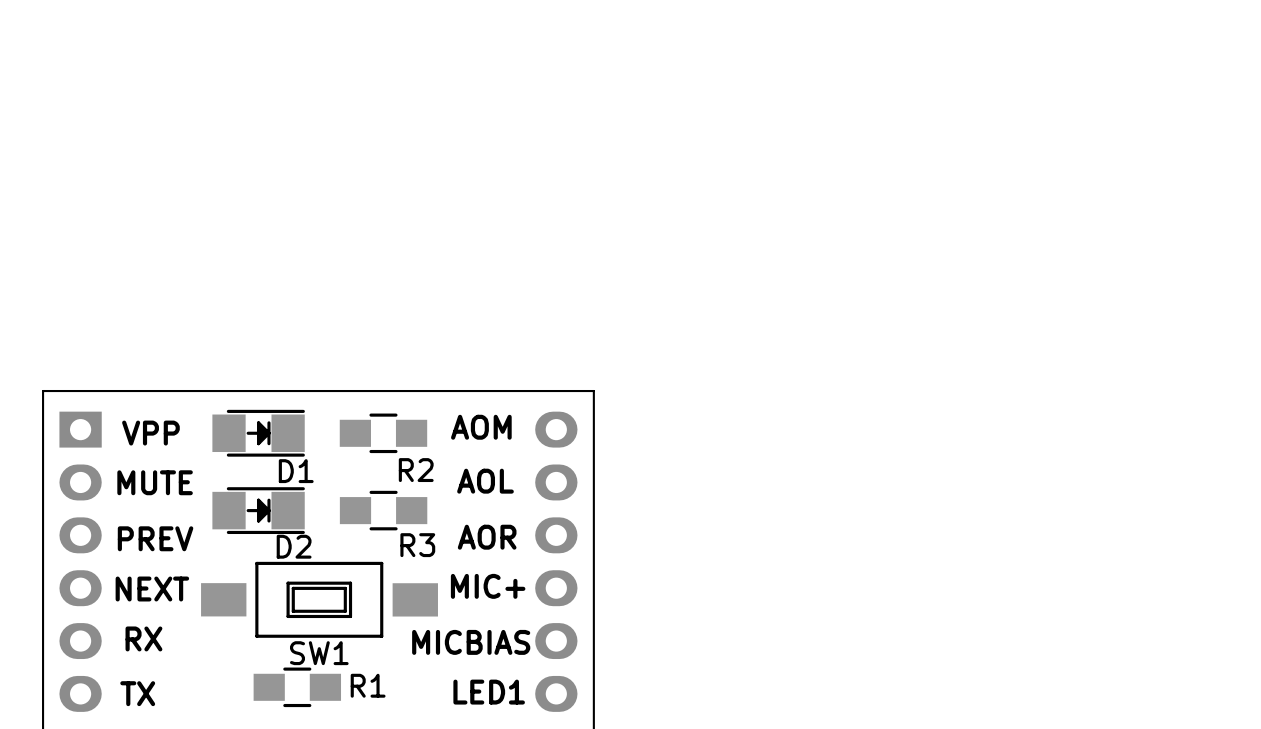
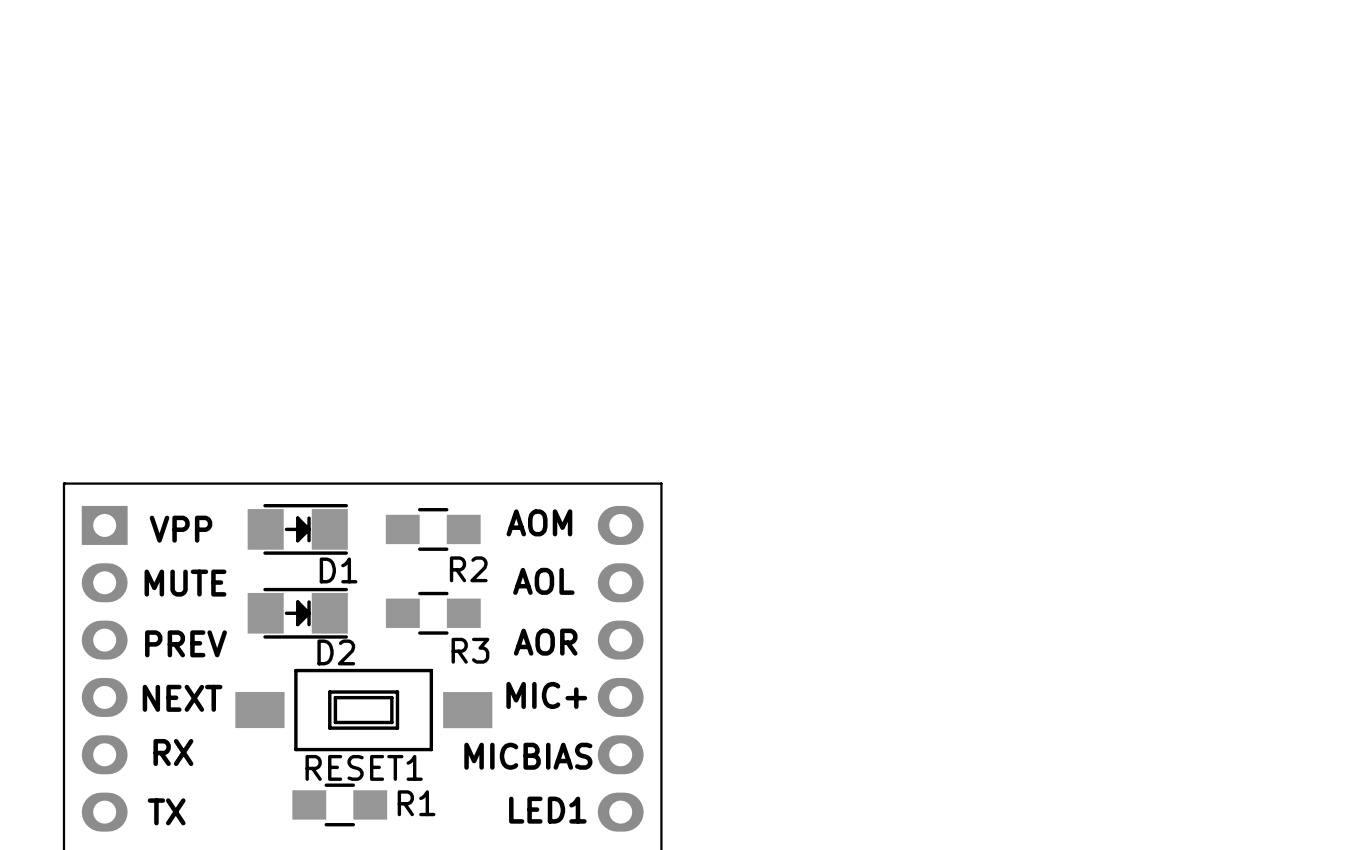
SW1 name: SW1 (319, 653) -> RESET1 (364, 767)

